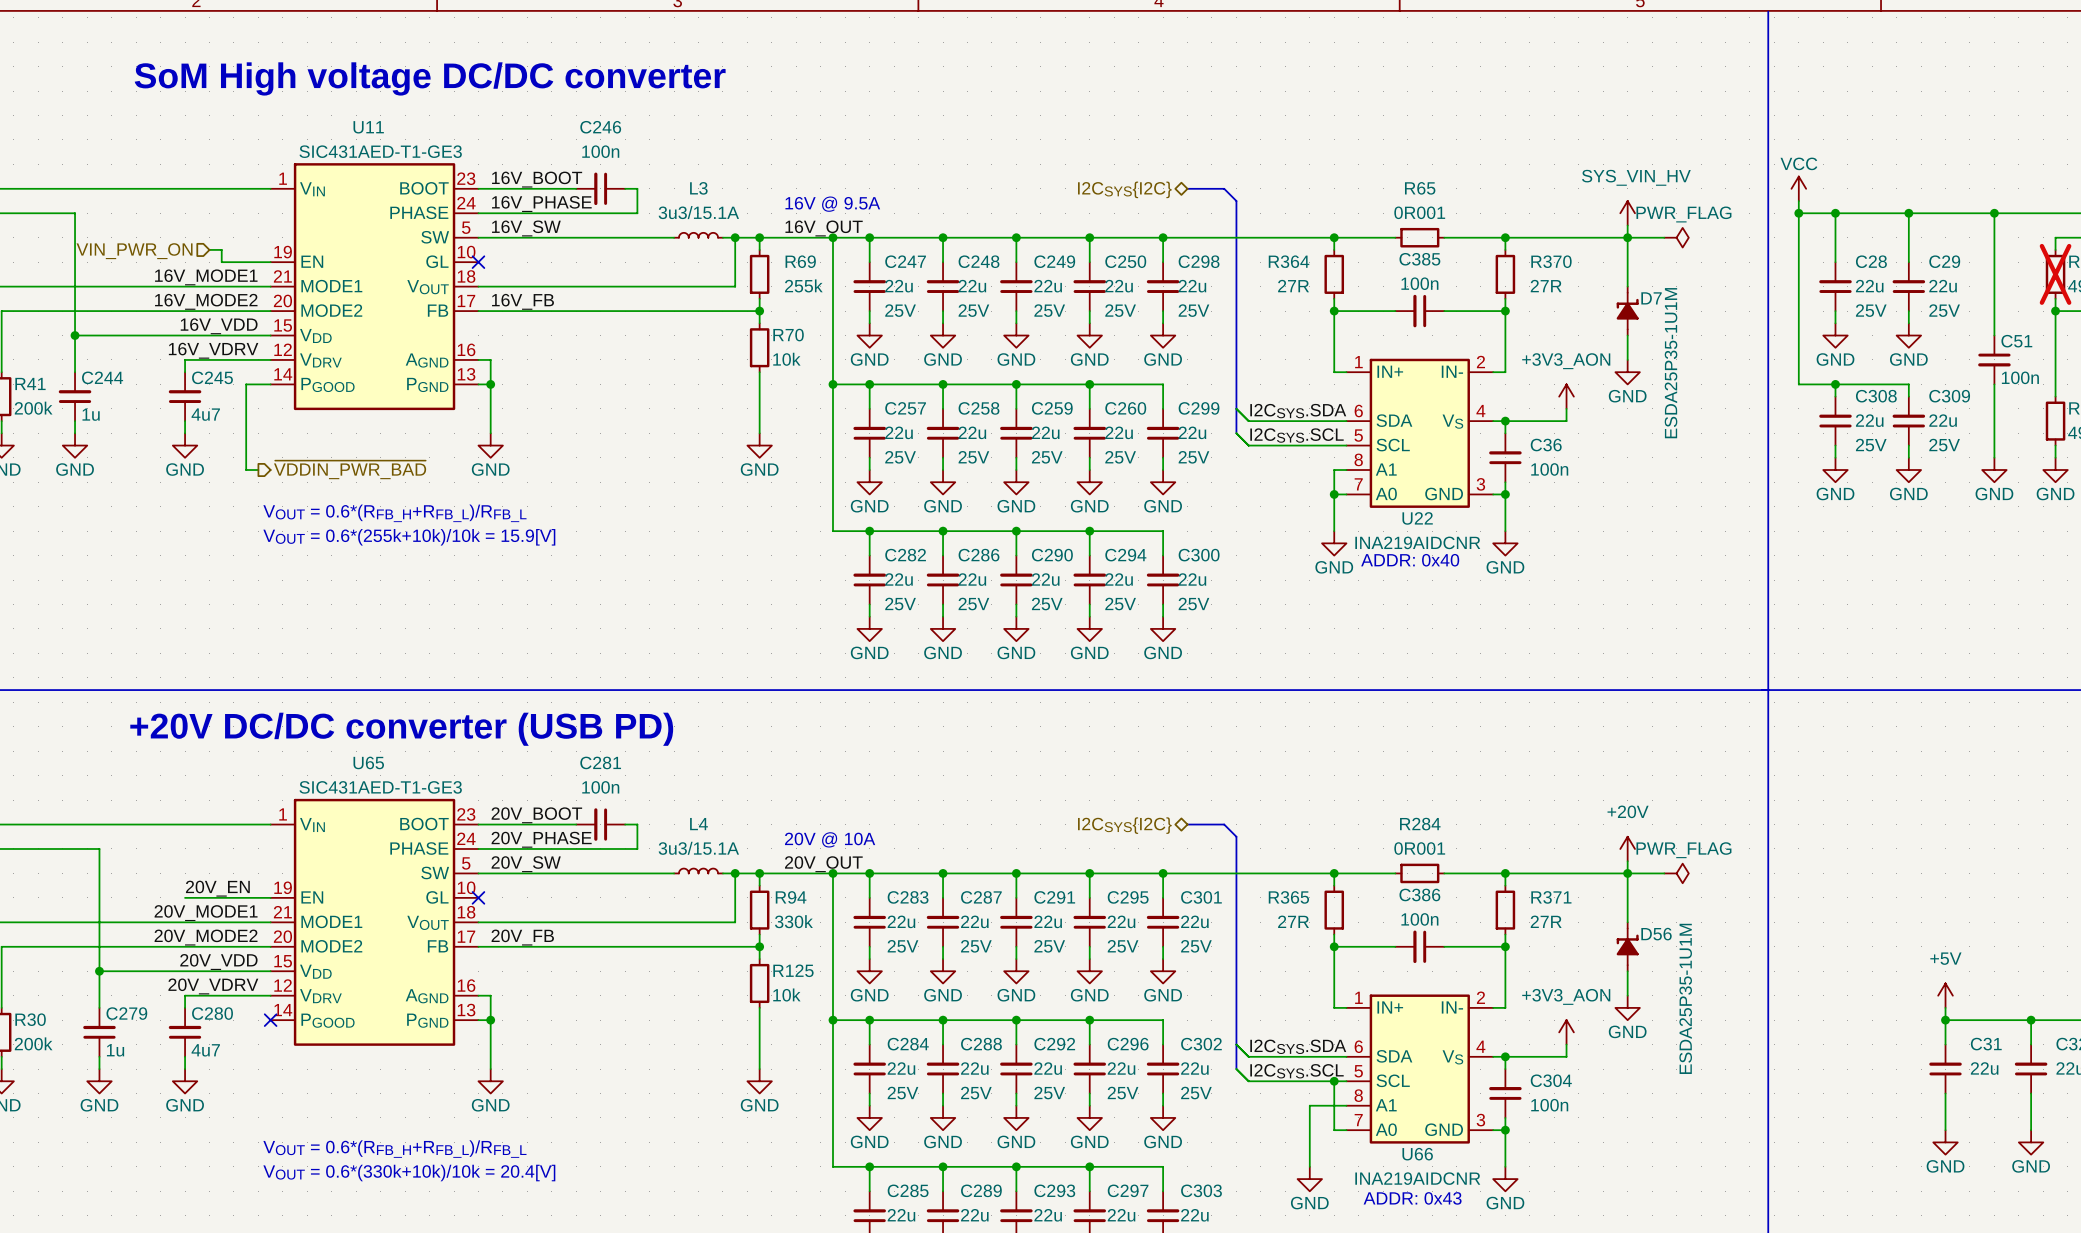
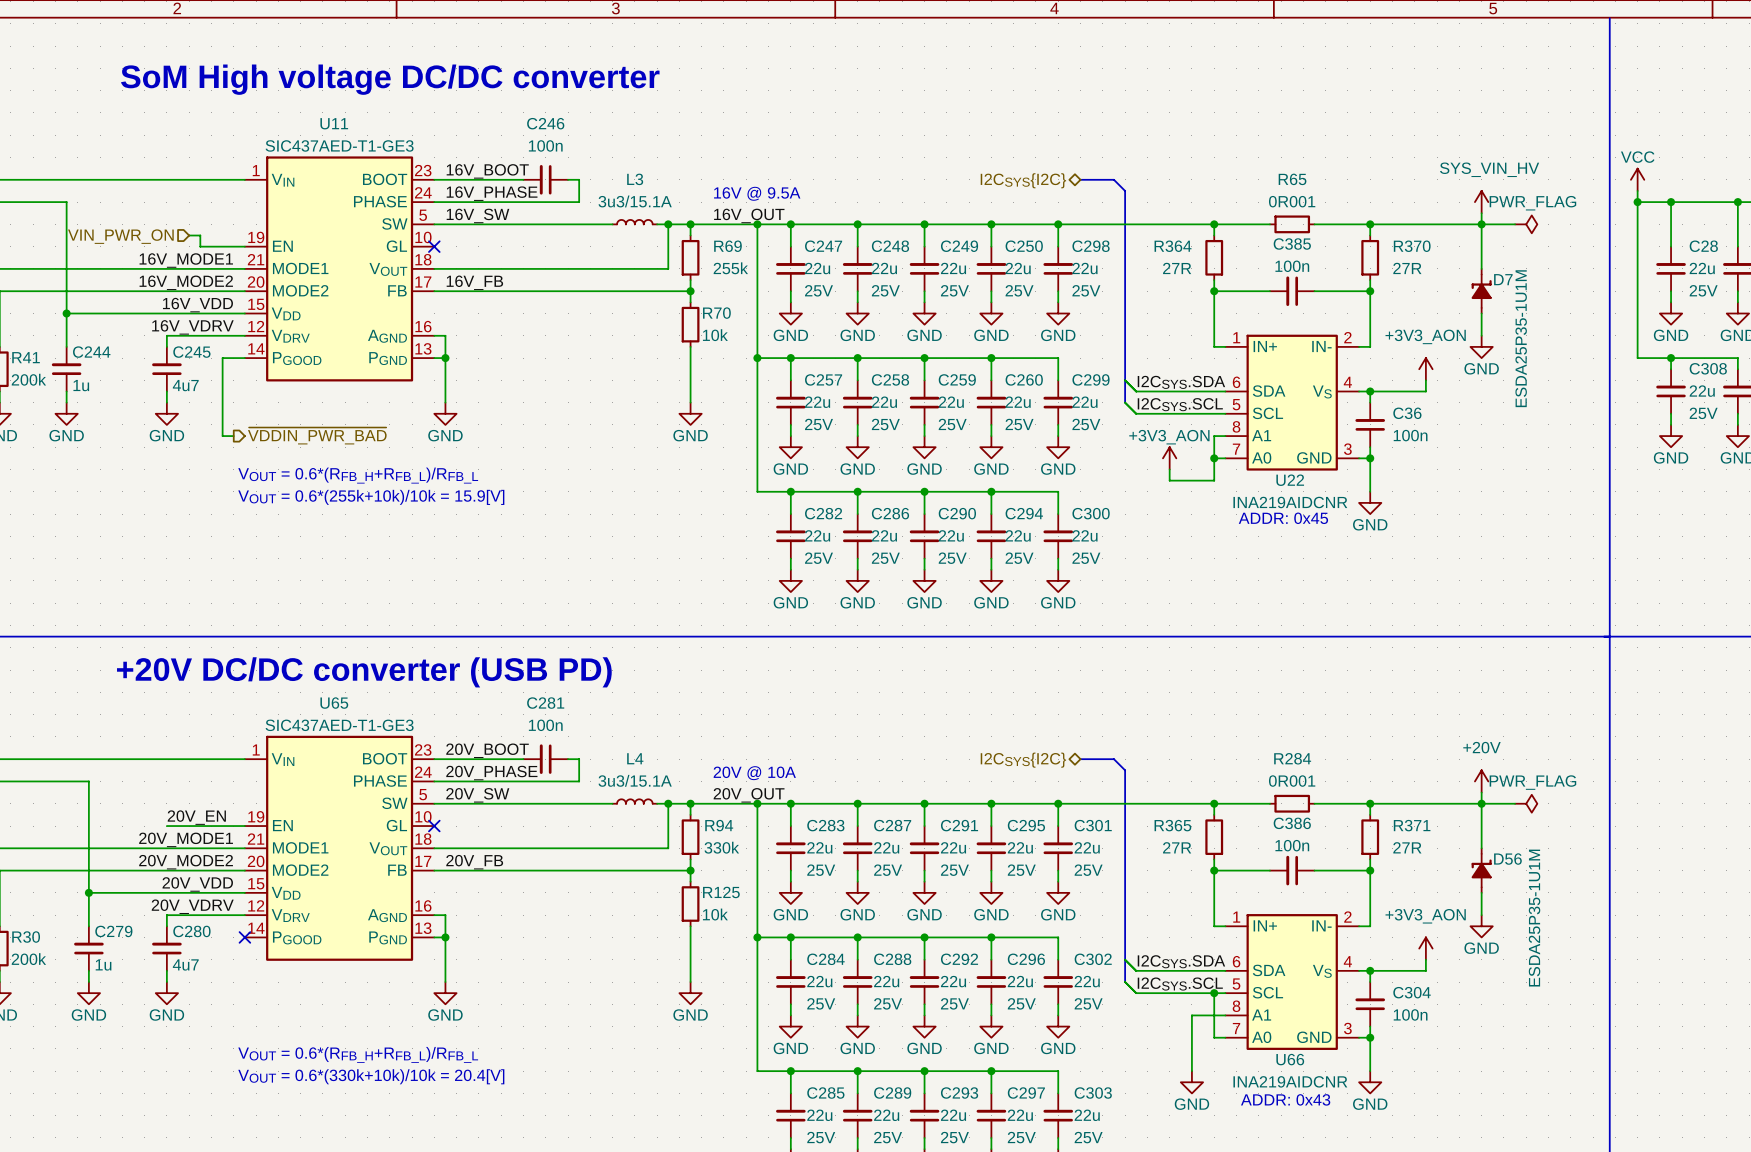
U11 text: SIC431AED-T1-GE3 (380, 151) -> SIC437AED-T1-GE3 (339, 145)
power symbol: none -> +3V3_AON (1169, 458)
wire: (1334, 518) (1334, 531) -> (1214, 480) (1169, 480) (1169, 469)
power symbol: GND (1334, 543) -> none
text: ADDR: 0x40 (1410, 560) -> ADDR: 0x45 (1283, 518)
U65 text: SIC431AED-T1-GE3 (380, 787) -> SIC437AED-T1-GE3 (339, 725)

